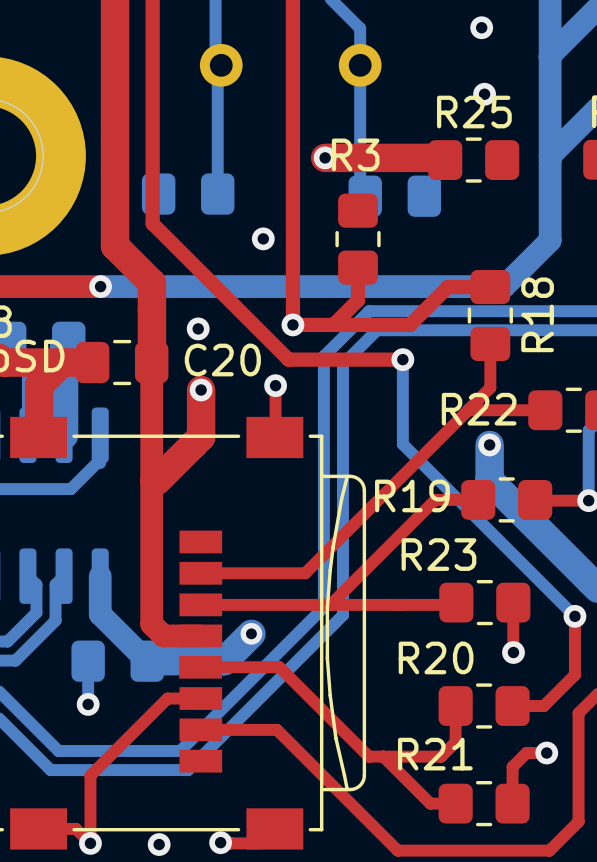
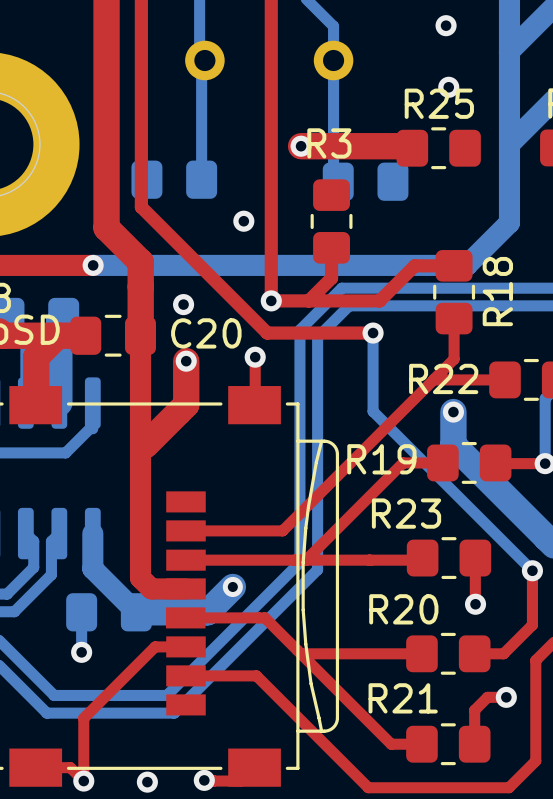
top track: (279, 667) (368, 756) (441, 756) (455, 742) (455, 706) -> (297, 650) (300, 653) (421, 653)
top track: (383, 756) (430, 803) -> (258, 617) (264, 617) (391, 744) (398, 744)

